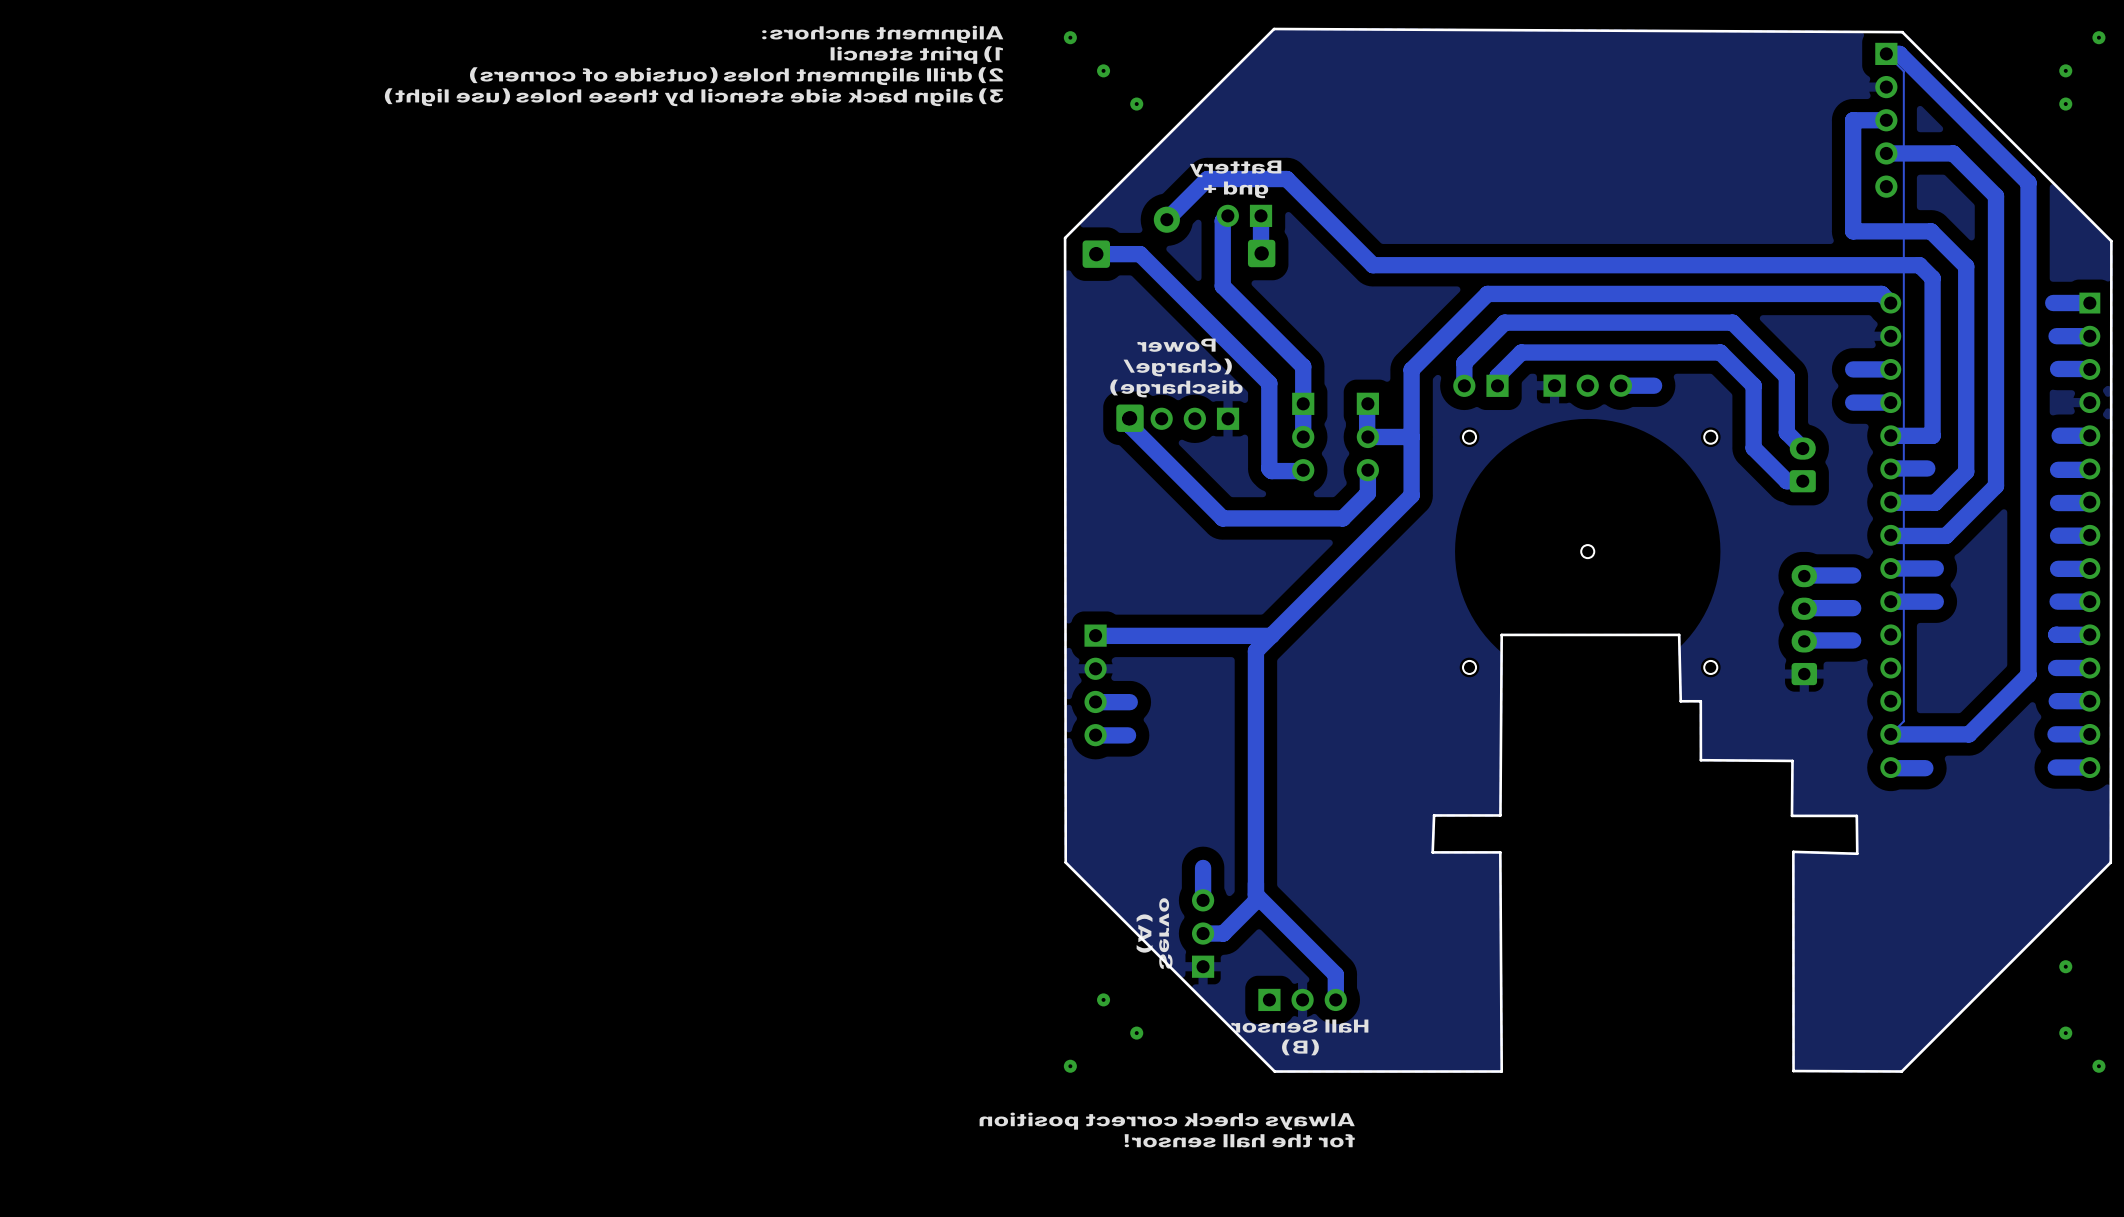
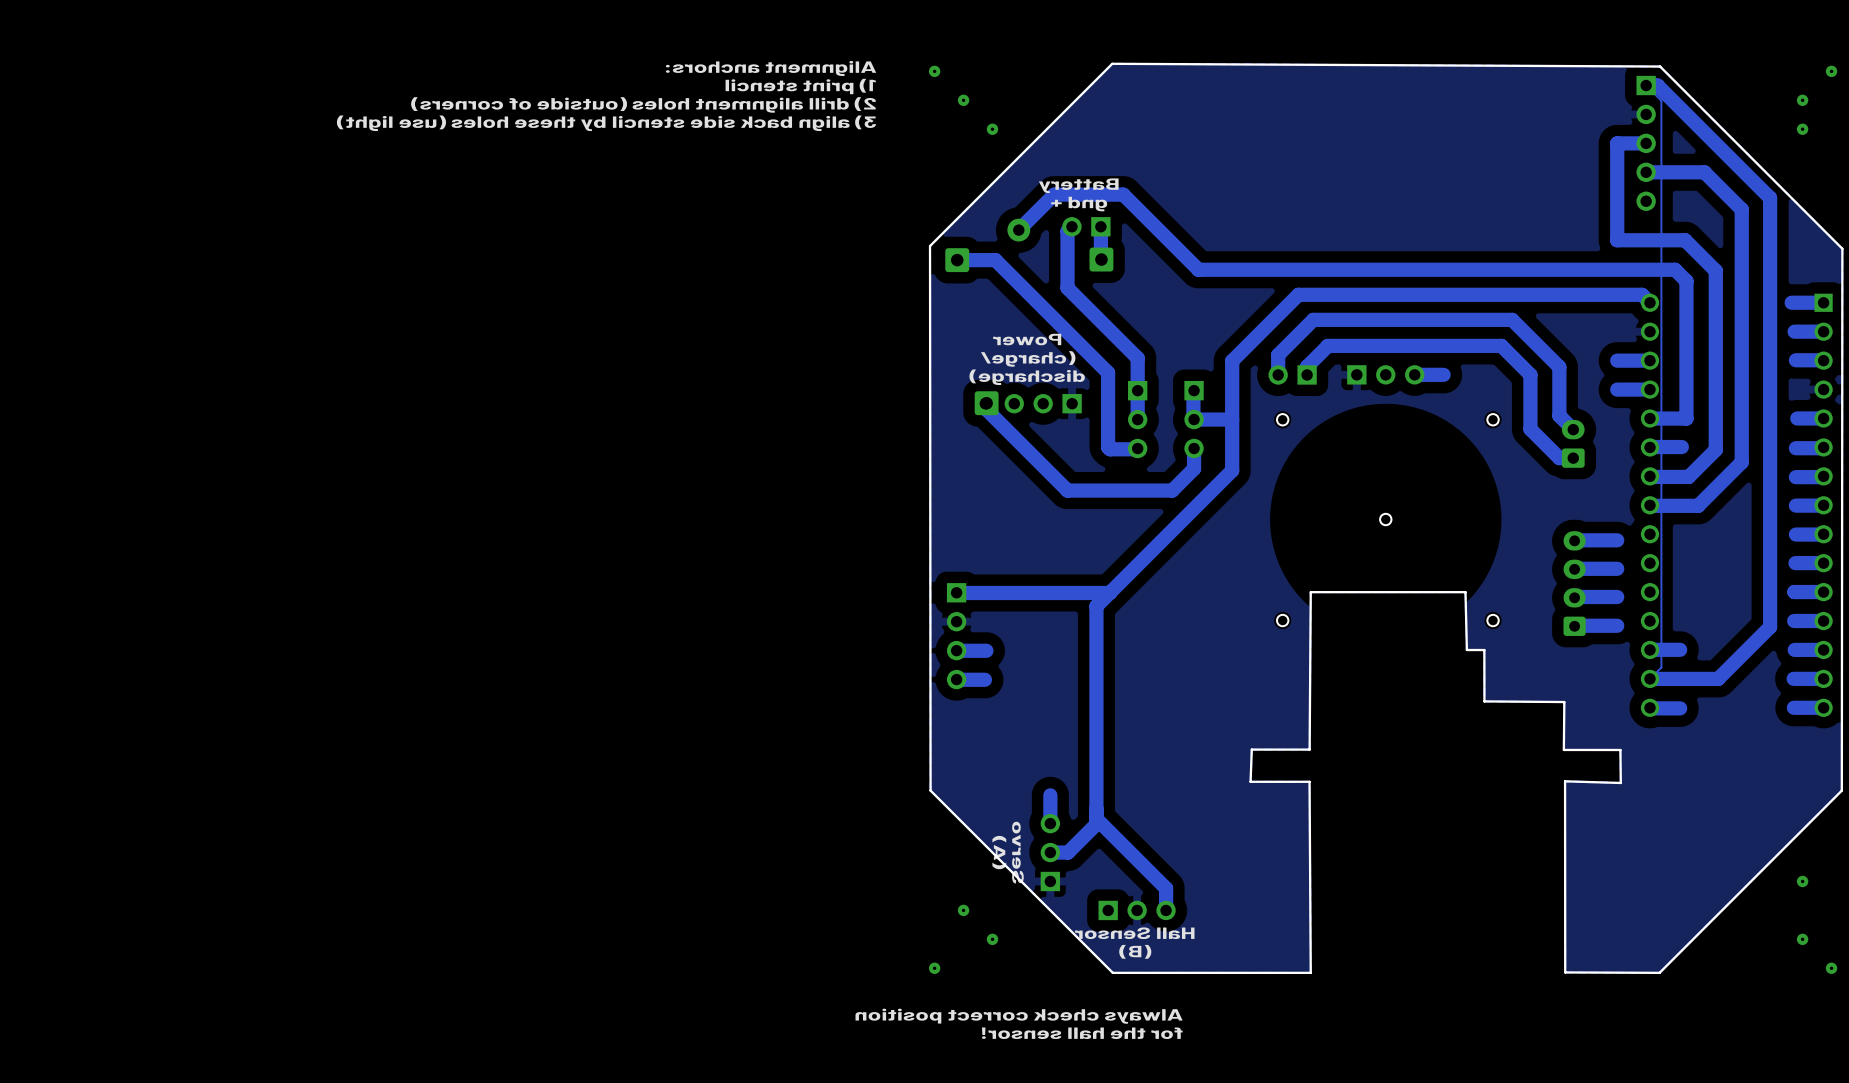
track: (1935, 568) (1890, 568) -> none
track: (1935, 601) (1890, 601) -> none
track: none -> (1617, 625) (1572, 625)
track: none -> (1680, 649) (1651, 649)

